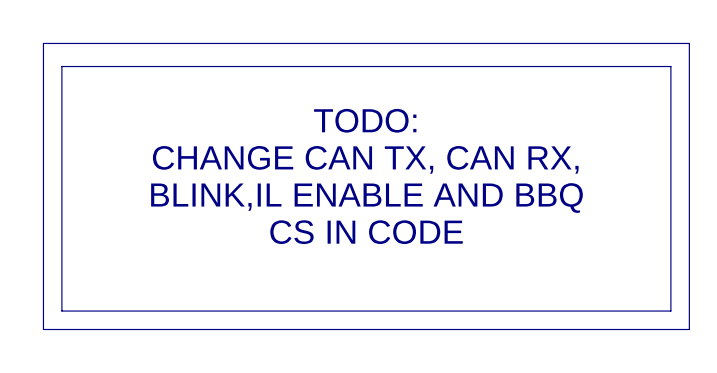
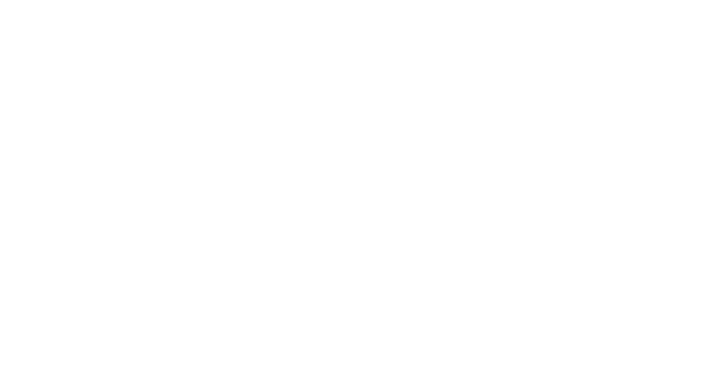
line: (43, 43) (689, 43) (689, 329) (43, 329) (43, 43) -> none
line: (61, 66) (670, 66) (670, 311) (61, 311) (61, 66) -> none
text: TODO: (365, 120) -> none
text: CHANGE CAN TX, CAN RX, (365, 159) -> none
text: BLINK,IL ENABLE AND BBQ (366, 198) -> none
text: CS IN CODE (366, 232) -> none

